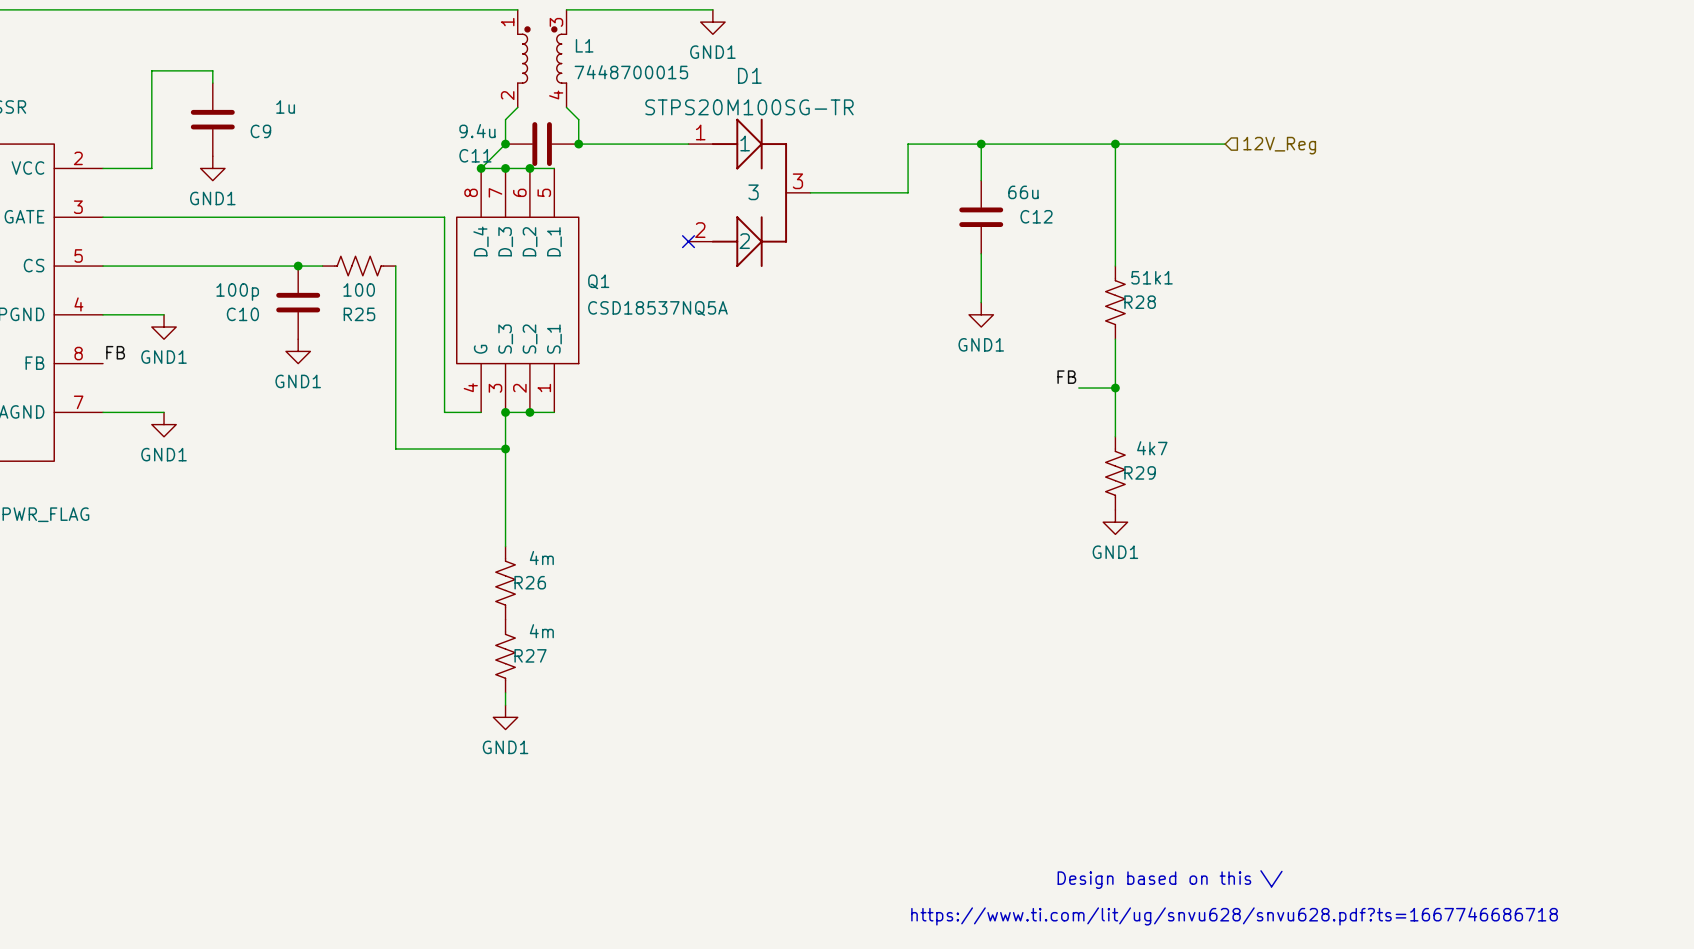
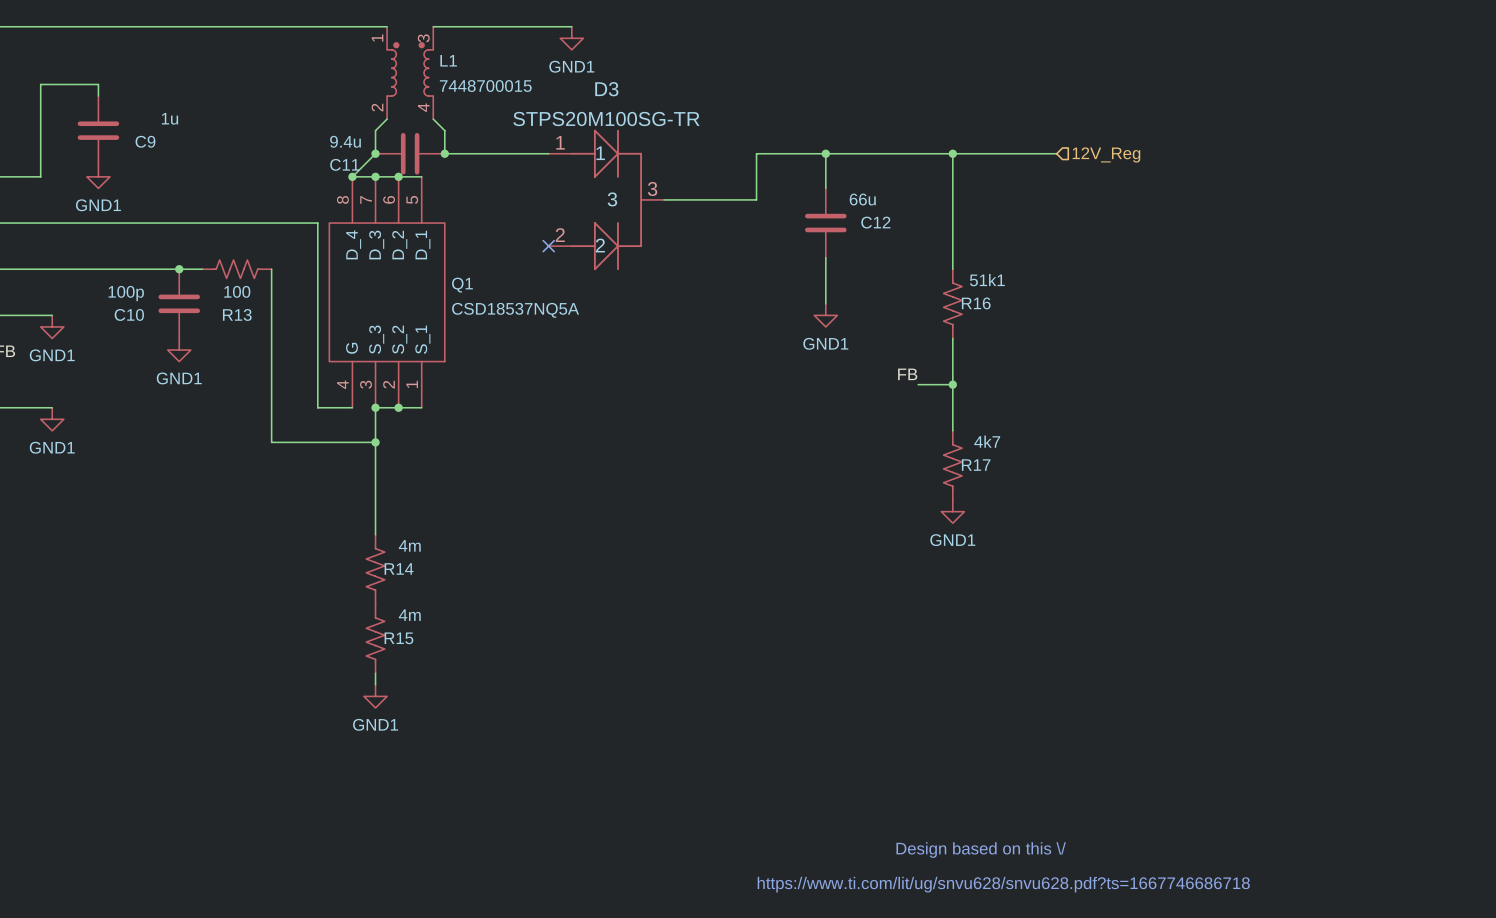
D1 name: D1 (749, 75) -> D3 (606, 89)
R28 name: R28 (1140, 302) -> R16 (976, 303)
R25 name: R25 (359, 314) -> R13 (237, 314)
R29 name: R29 (1140, 472) -> R17 (976, 465)
R26 name: R26 (530, 582) -> R14 (399, 568)
R27 name: R27 (530, 655) -> R15 (398, 638)

